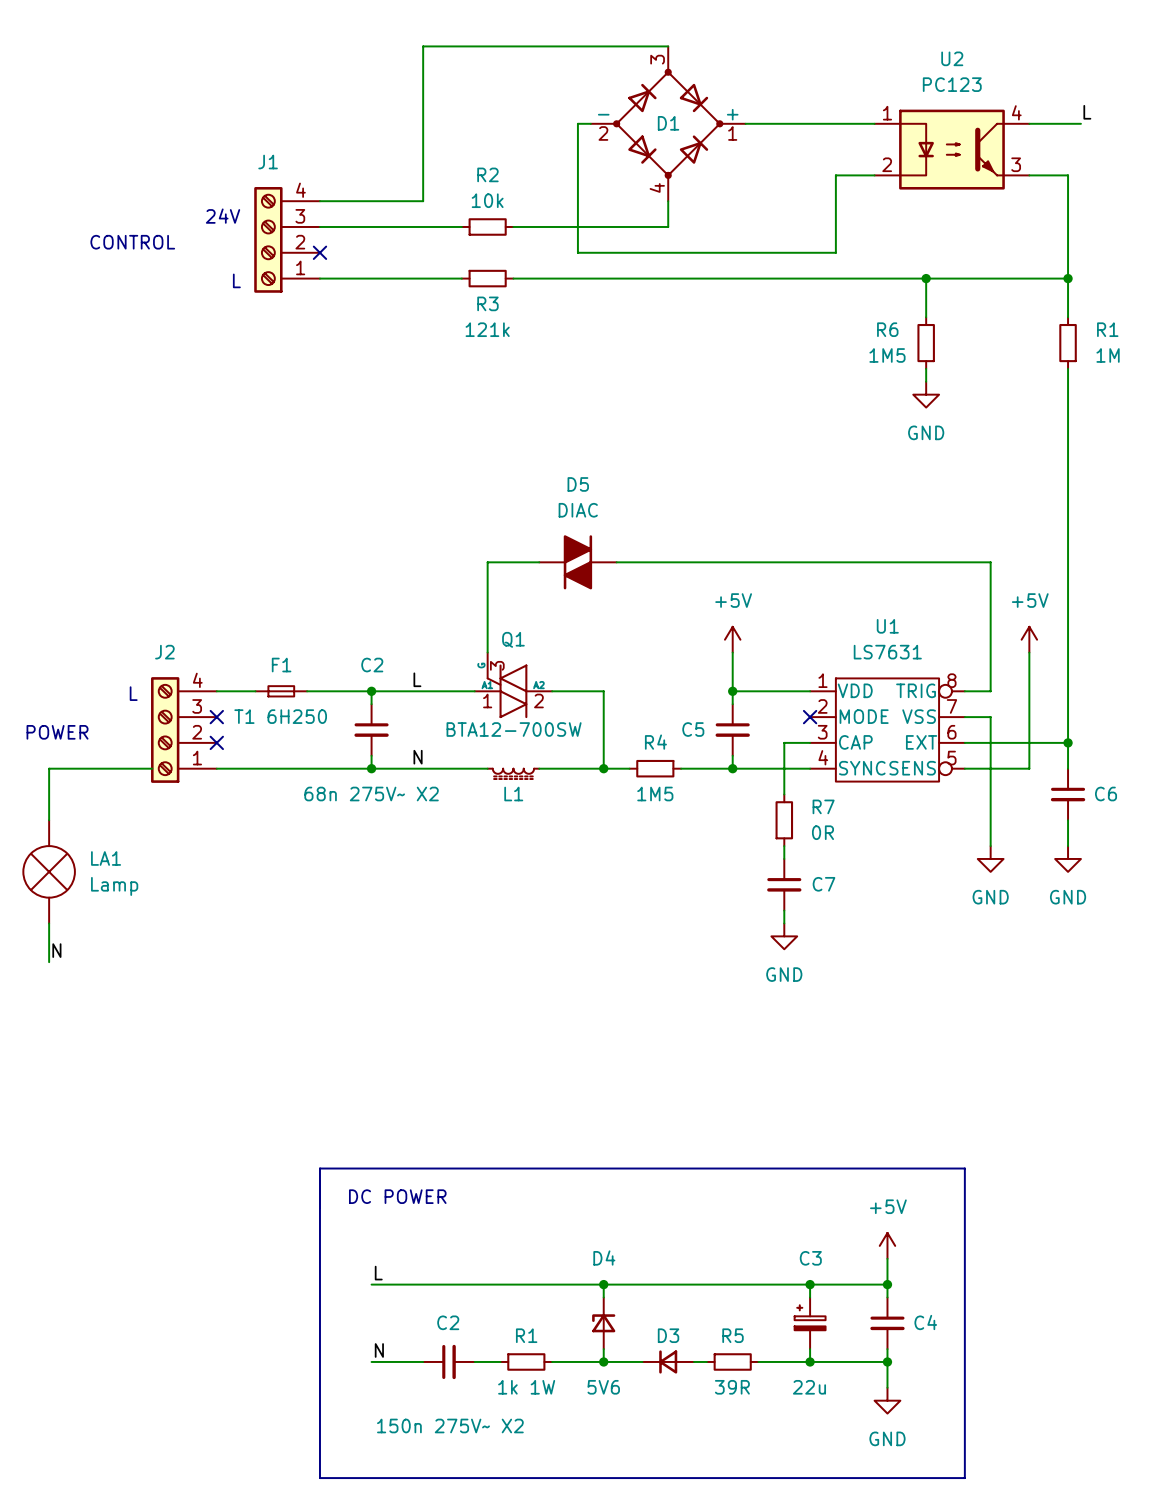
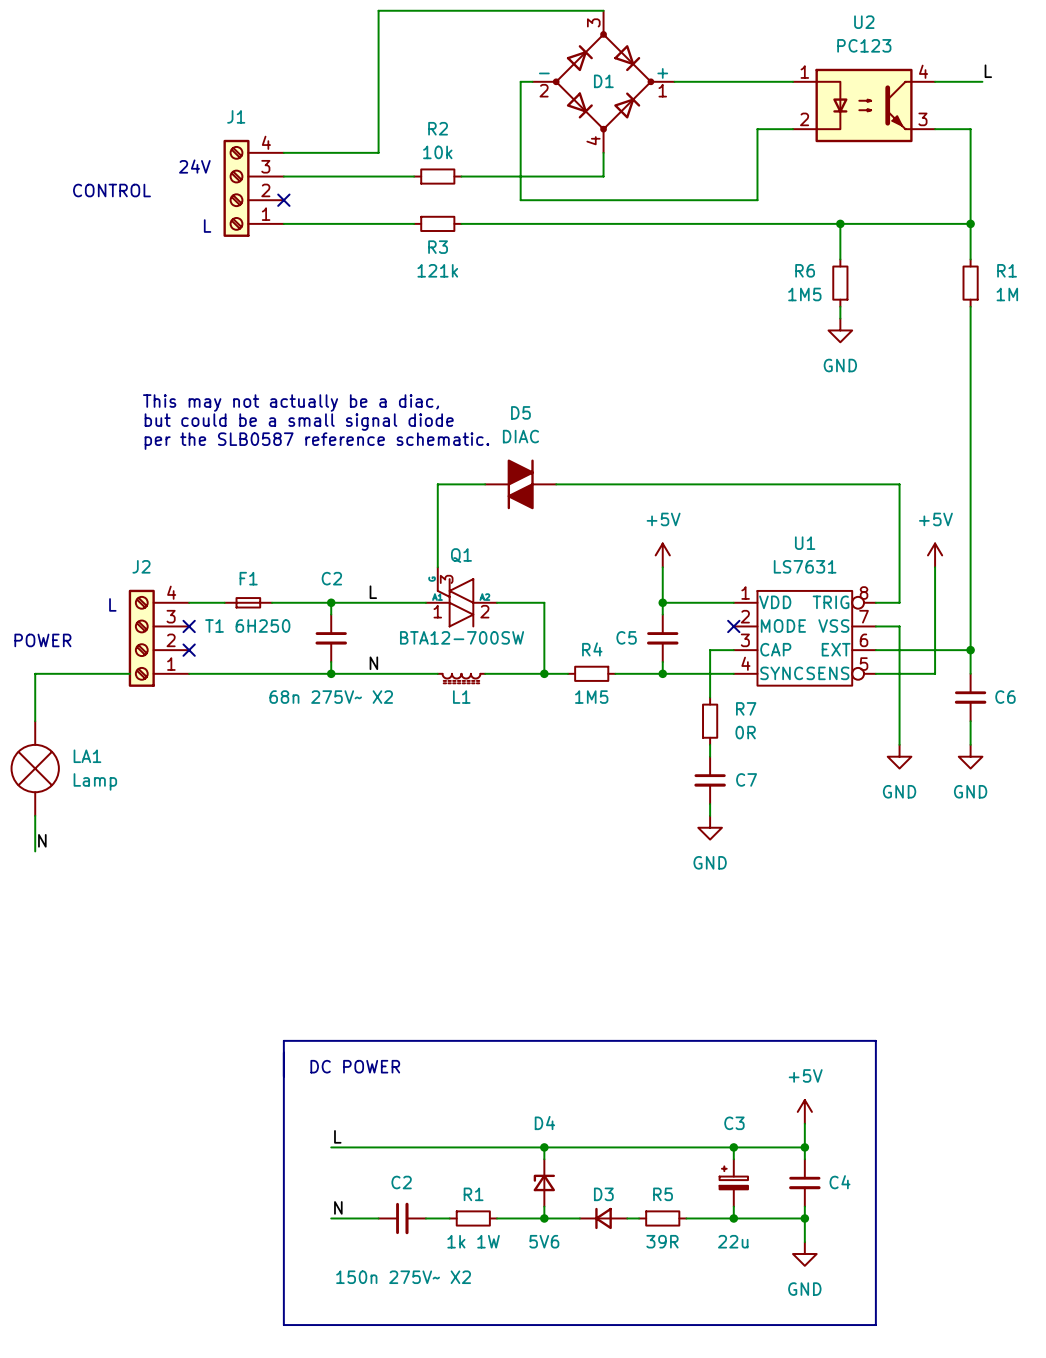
text: none -> This may not actually be a diac, (291, 403)
text: none -> but could be a small signal diode (299, 422)
text: none -> per the SLB0587 reference schematic. (316, 441)

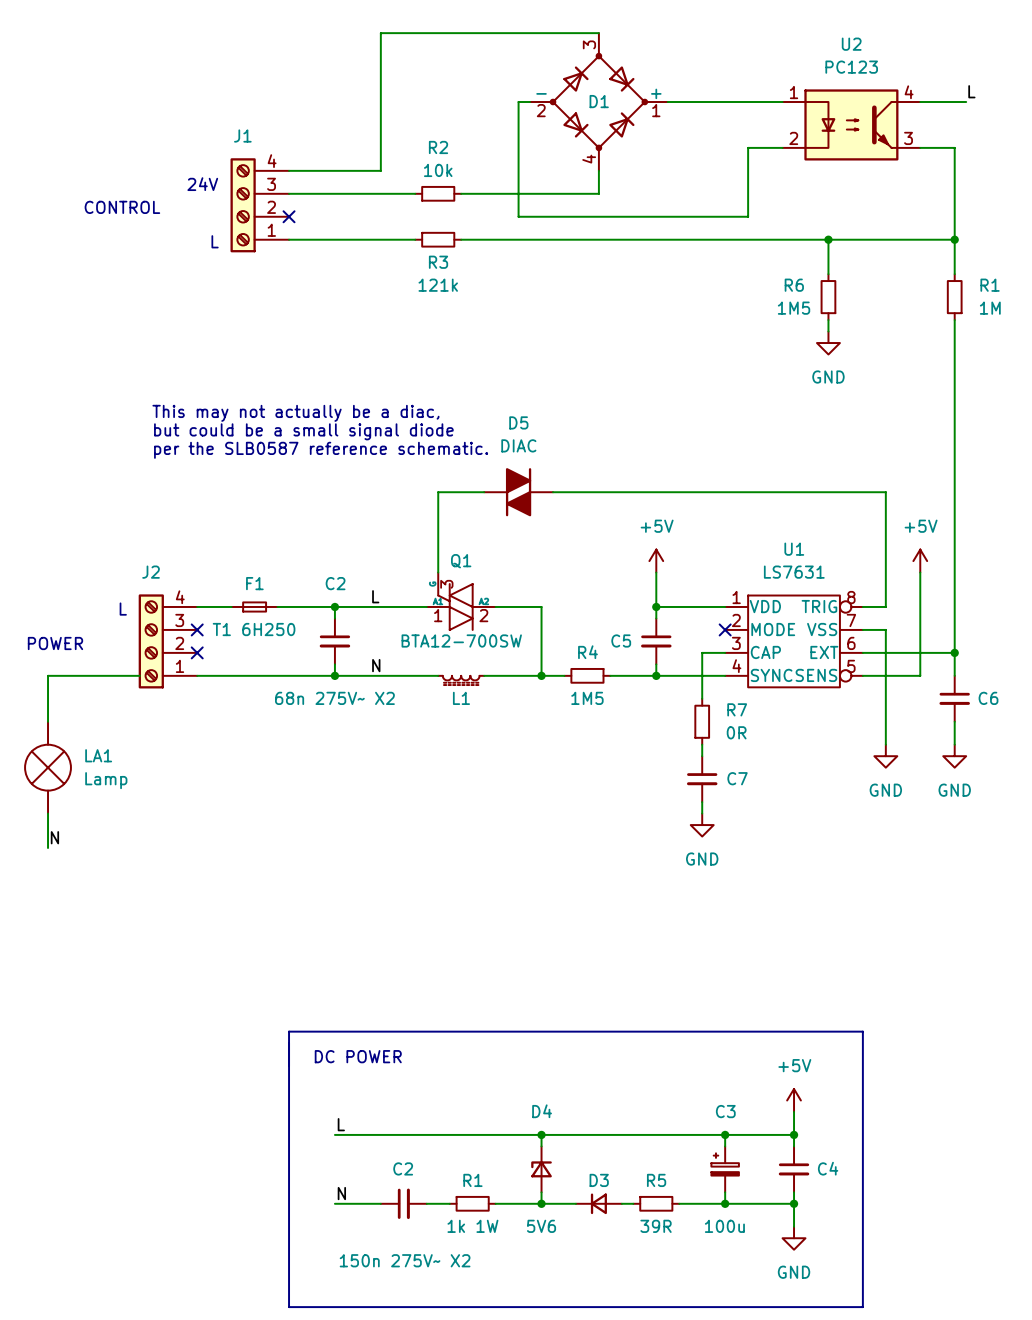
C3 value: 22u (733, 1241) -> 100u (724, 1226)

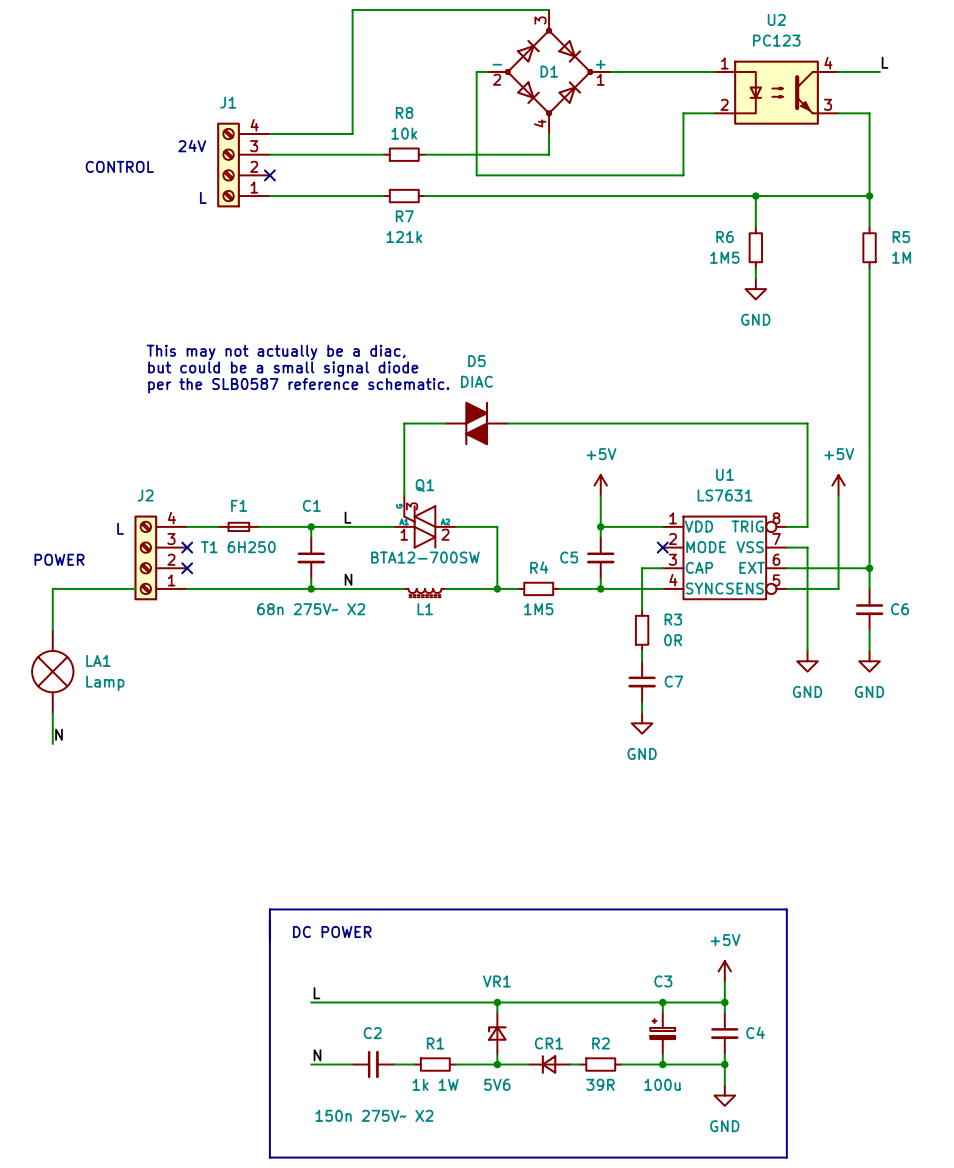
R2 name: R2 (438, 147) -> R8 (404, 112)
R3 name: R3 (438, 262) -> R7 (404, 216)
R1 name: R1 (990, 285) -> R5 (901, 237)
C2 name: C2 (335, 583) -> C1 (311, 505)
R7 name: R7 (737, 709) -> R3 (673, 619)
D4 name: D4 (542, 1111) -> VR1 (496, 981)
D3 name: D3 (599, 1180) -> CR1 (549, 1043)
R5 name: R5 (656, 1180) -> R2 (600, 1043)

